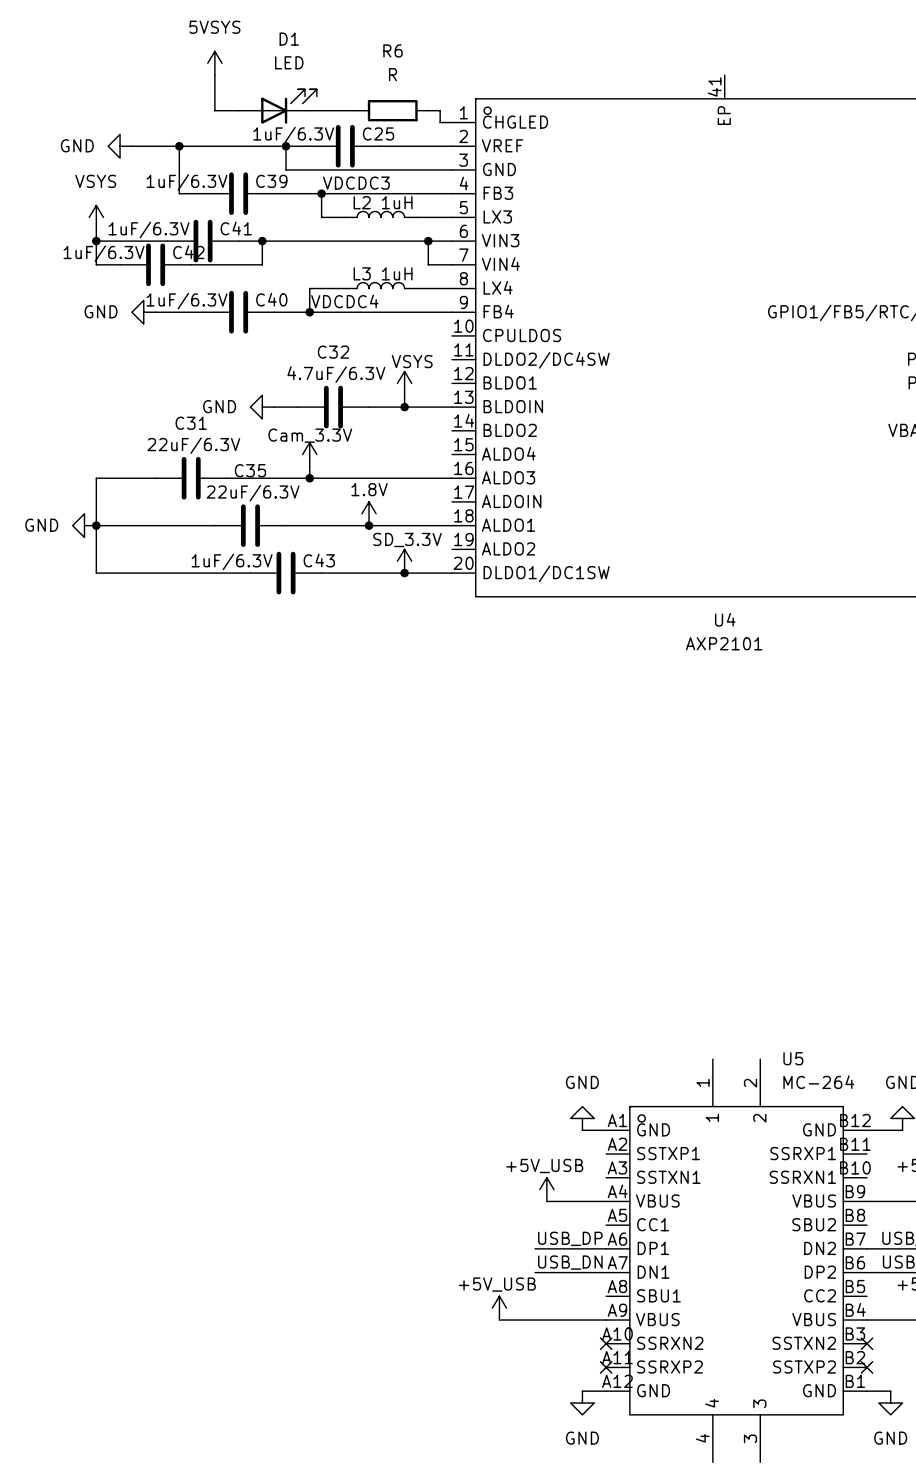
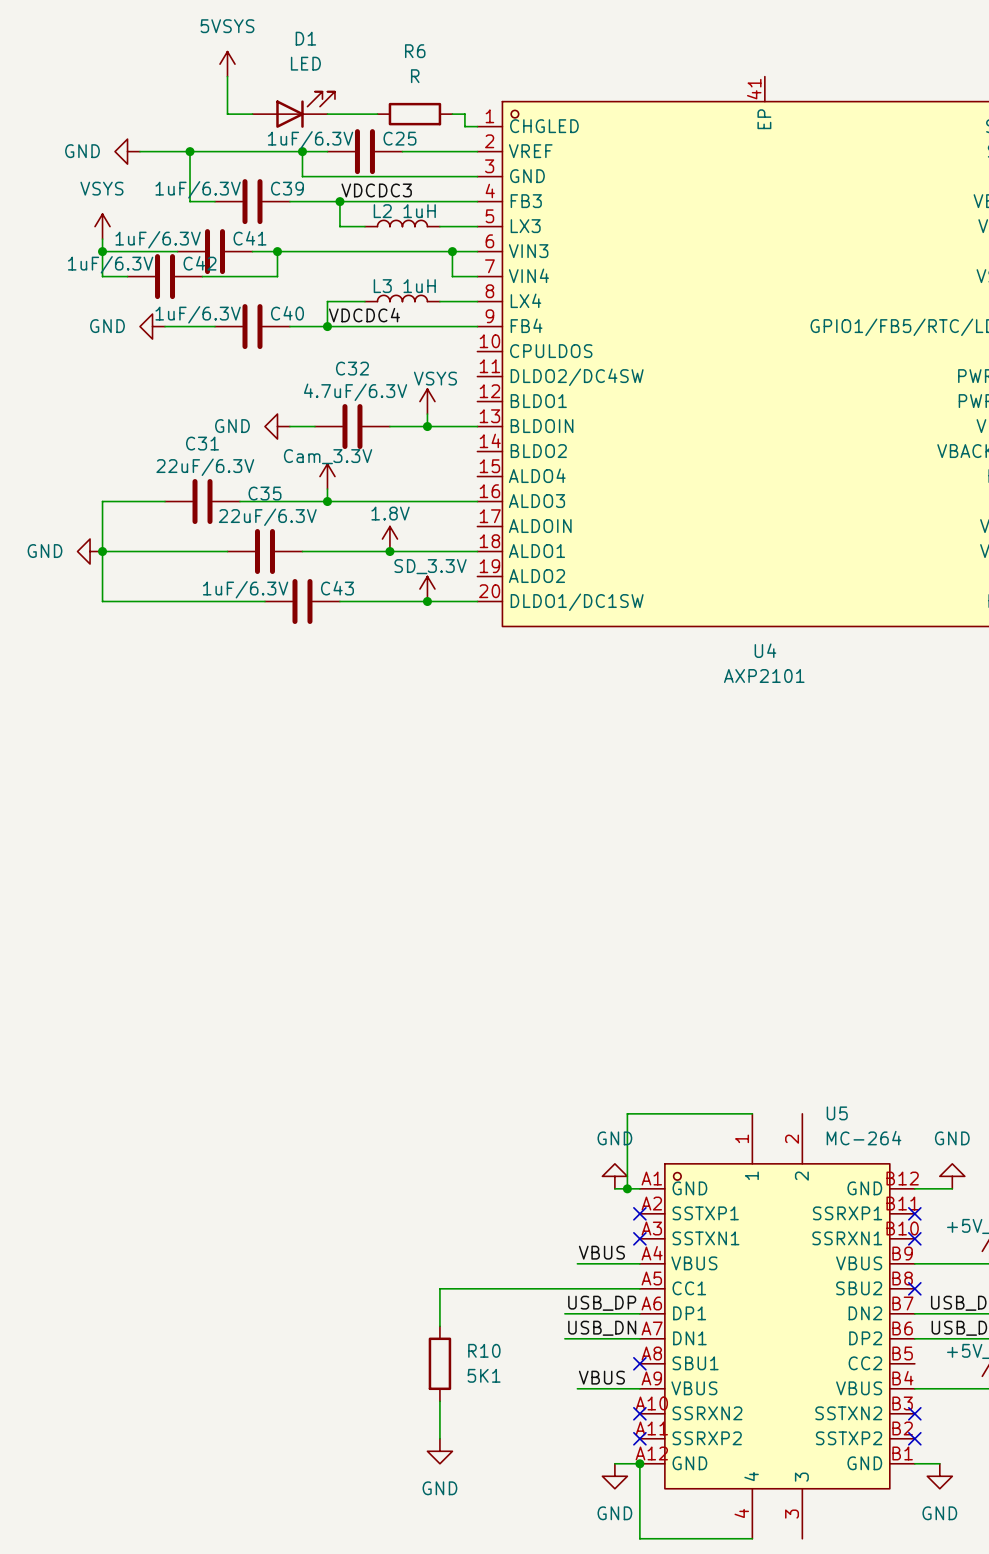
wire: none -> (752, 1113) (627, 1113) (627, 1188)
junction: none -> (627, 1188)
no-connect mark: none -> (639, 1213)
no-connect mark: none -> (914, 1213)
no-connect mark: none -> (639, 1238)
no-connect mark: none -> (914, 1238)
power symbol: +5V_USB (546, 1189) -> none
label: none -> VBUS (601, 1252)
wire: none -> (639, 1288) (439, 1288) (439, 1326)
no-connect mark: none -> (914, 1288)
R10: none -> 5K1 (439, 1363)
no-connect mark: none -> (639, 1363)
power symbol: +5V_USB (499, 1308) -> none
label: none -> VBUS (601, 1377)
wire: (499, 1320) (546, 1320) -> none
wire: none -> (439, 1401) (439, 1438)
power symbol: none -> GND (439, 1451)
wire: none -> (639, 1463) (639, 1538) (752, 1538)
junction: none -> (639, 1463)

